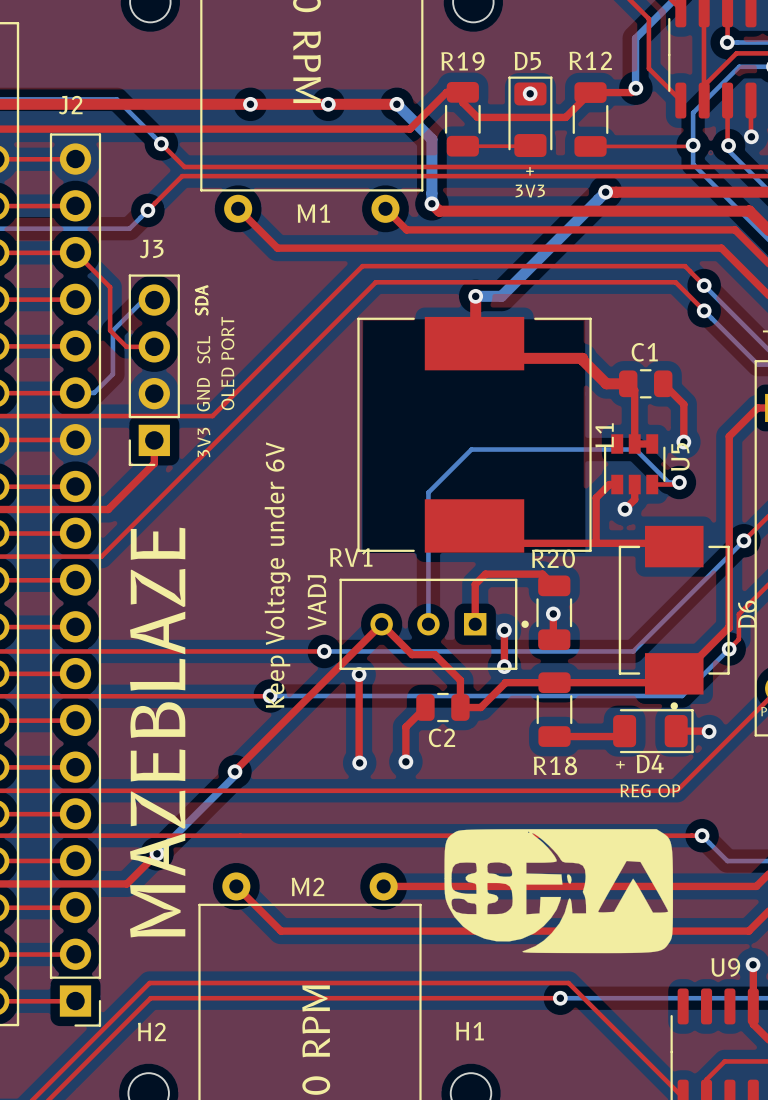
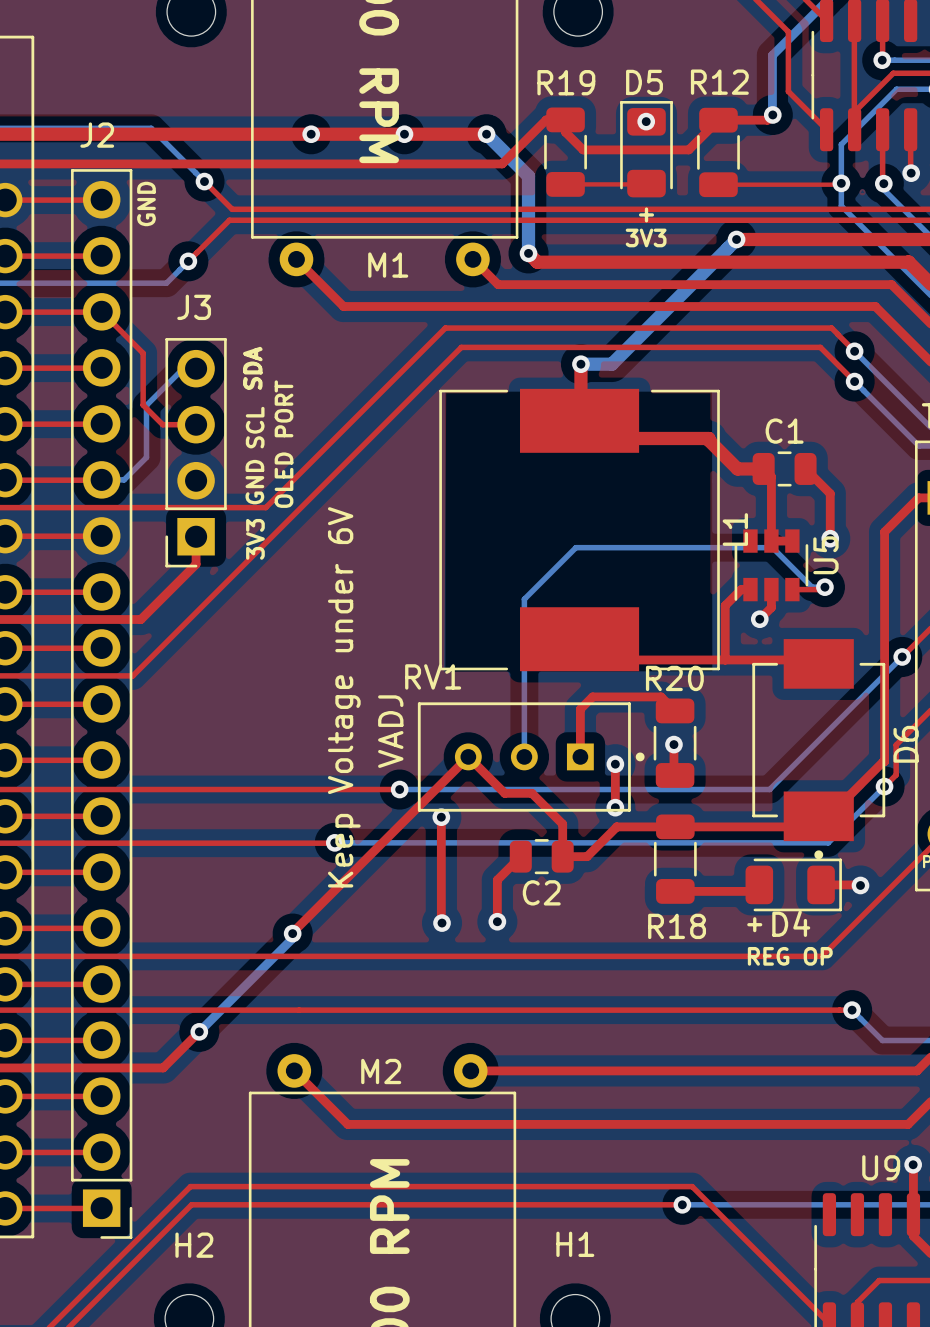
text: none -> GND (146, 203)
text: MAZEBLAZE (157, 732) -> none
drawing: [444, 829, 674, 954] -> none

